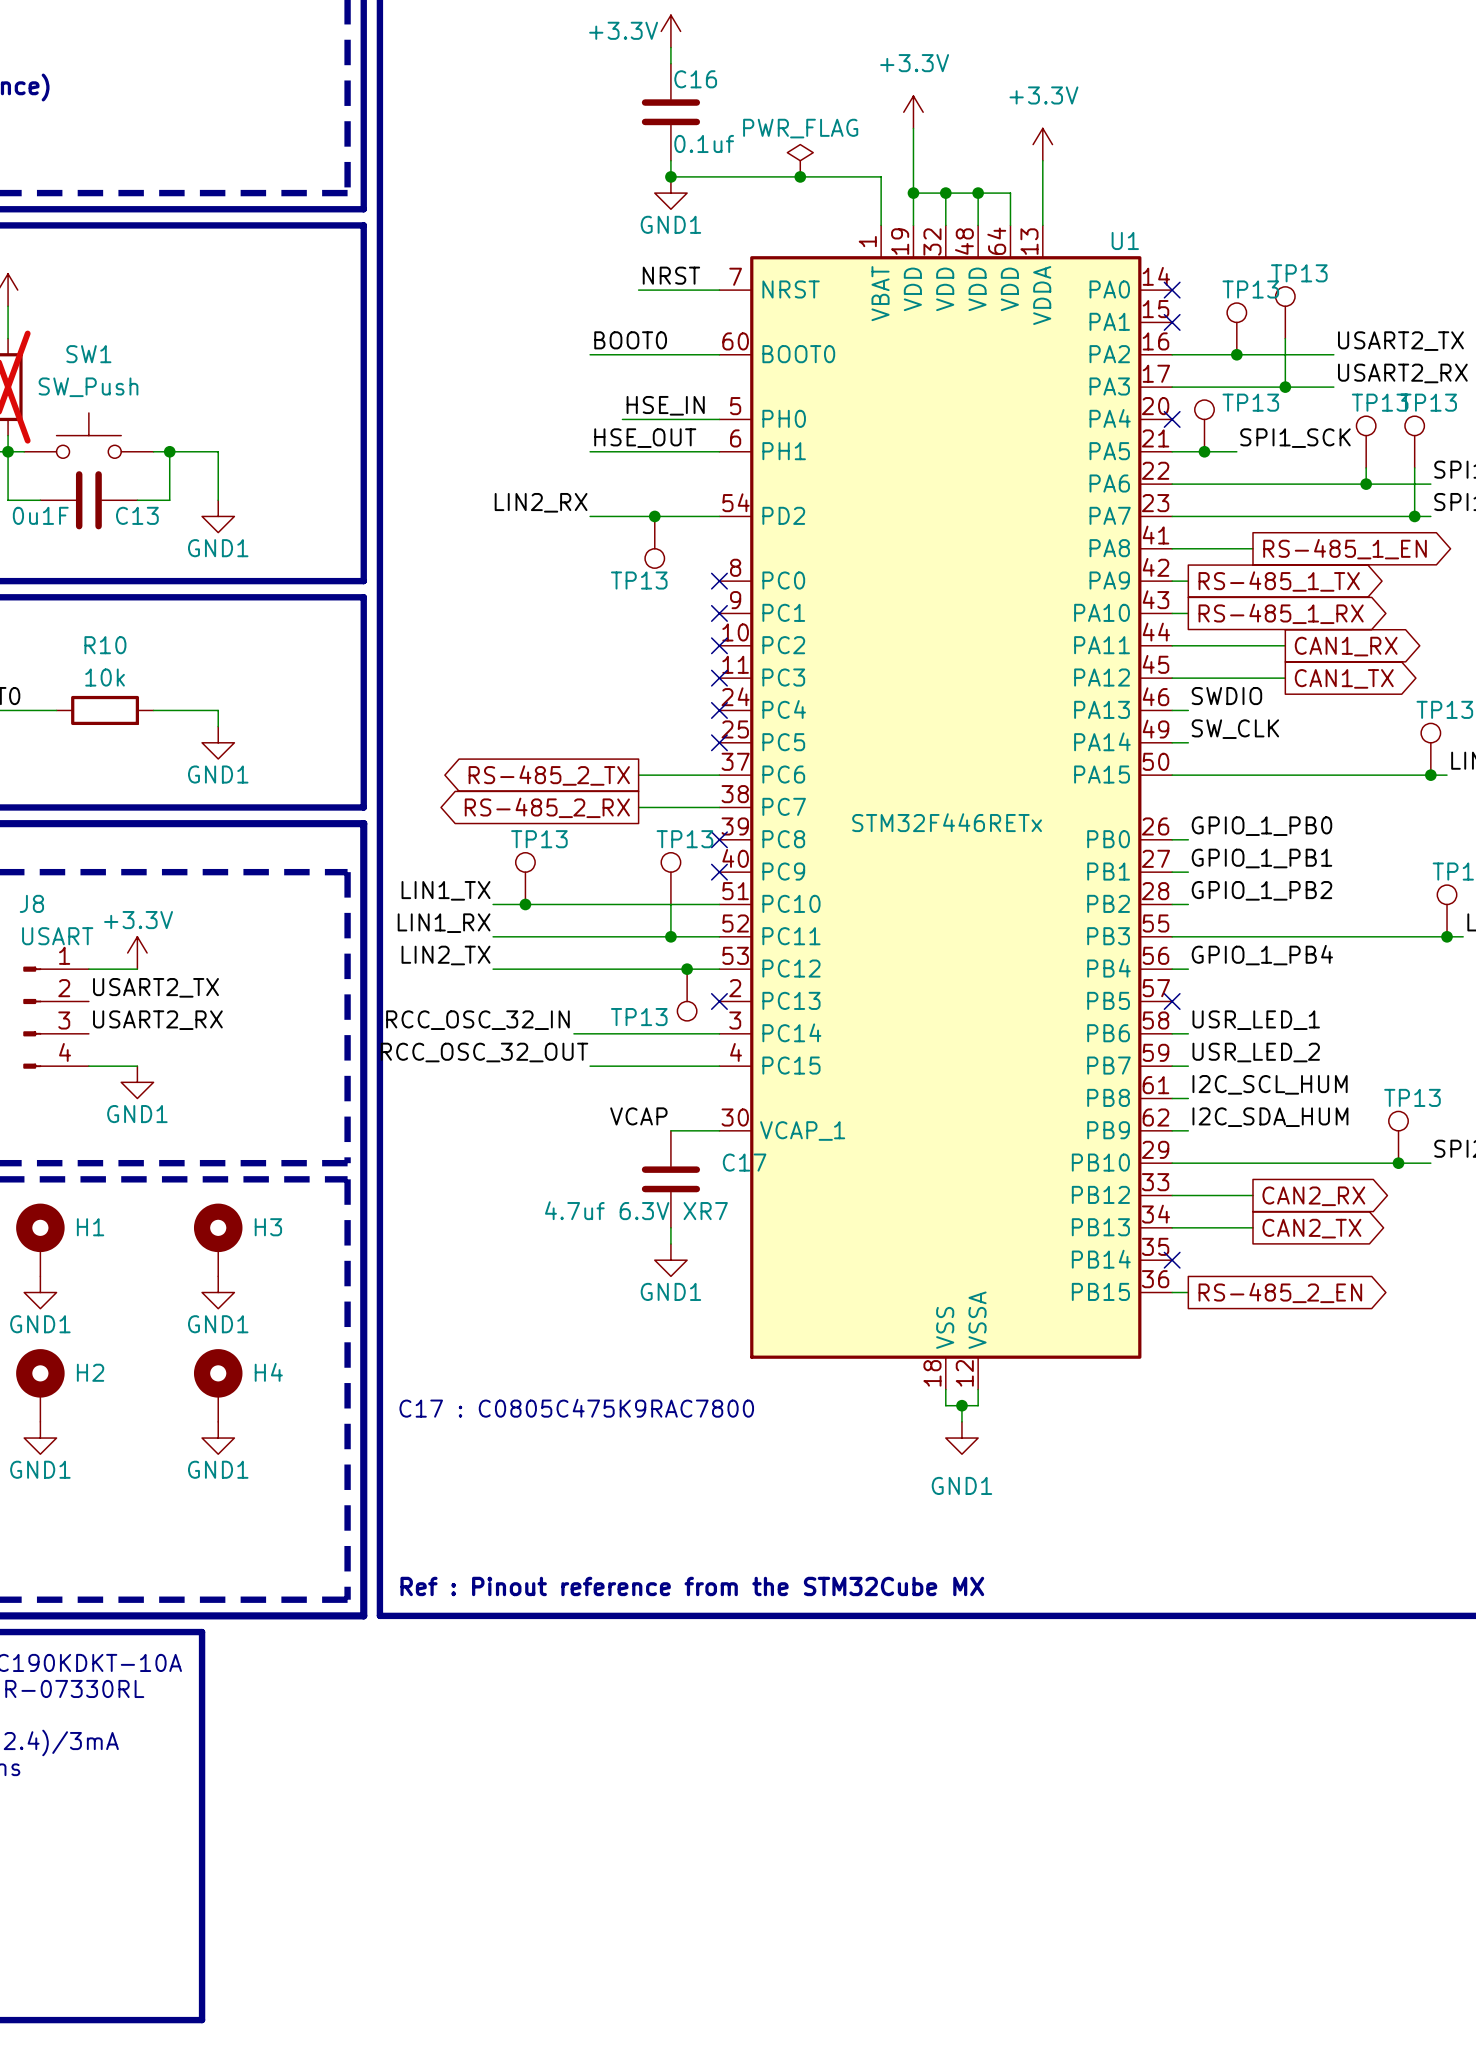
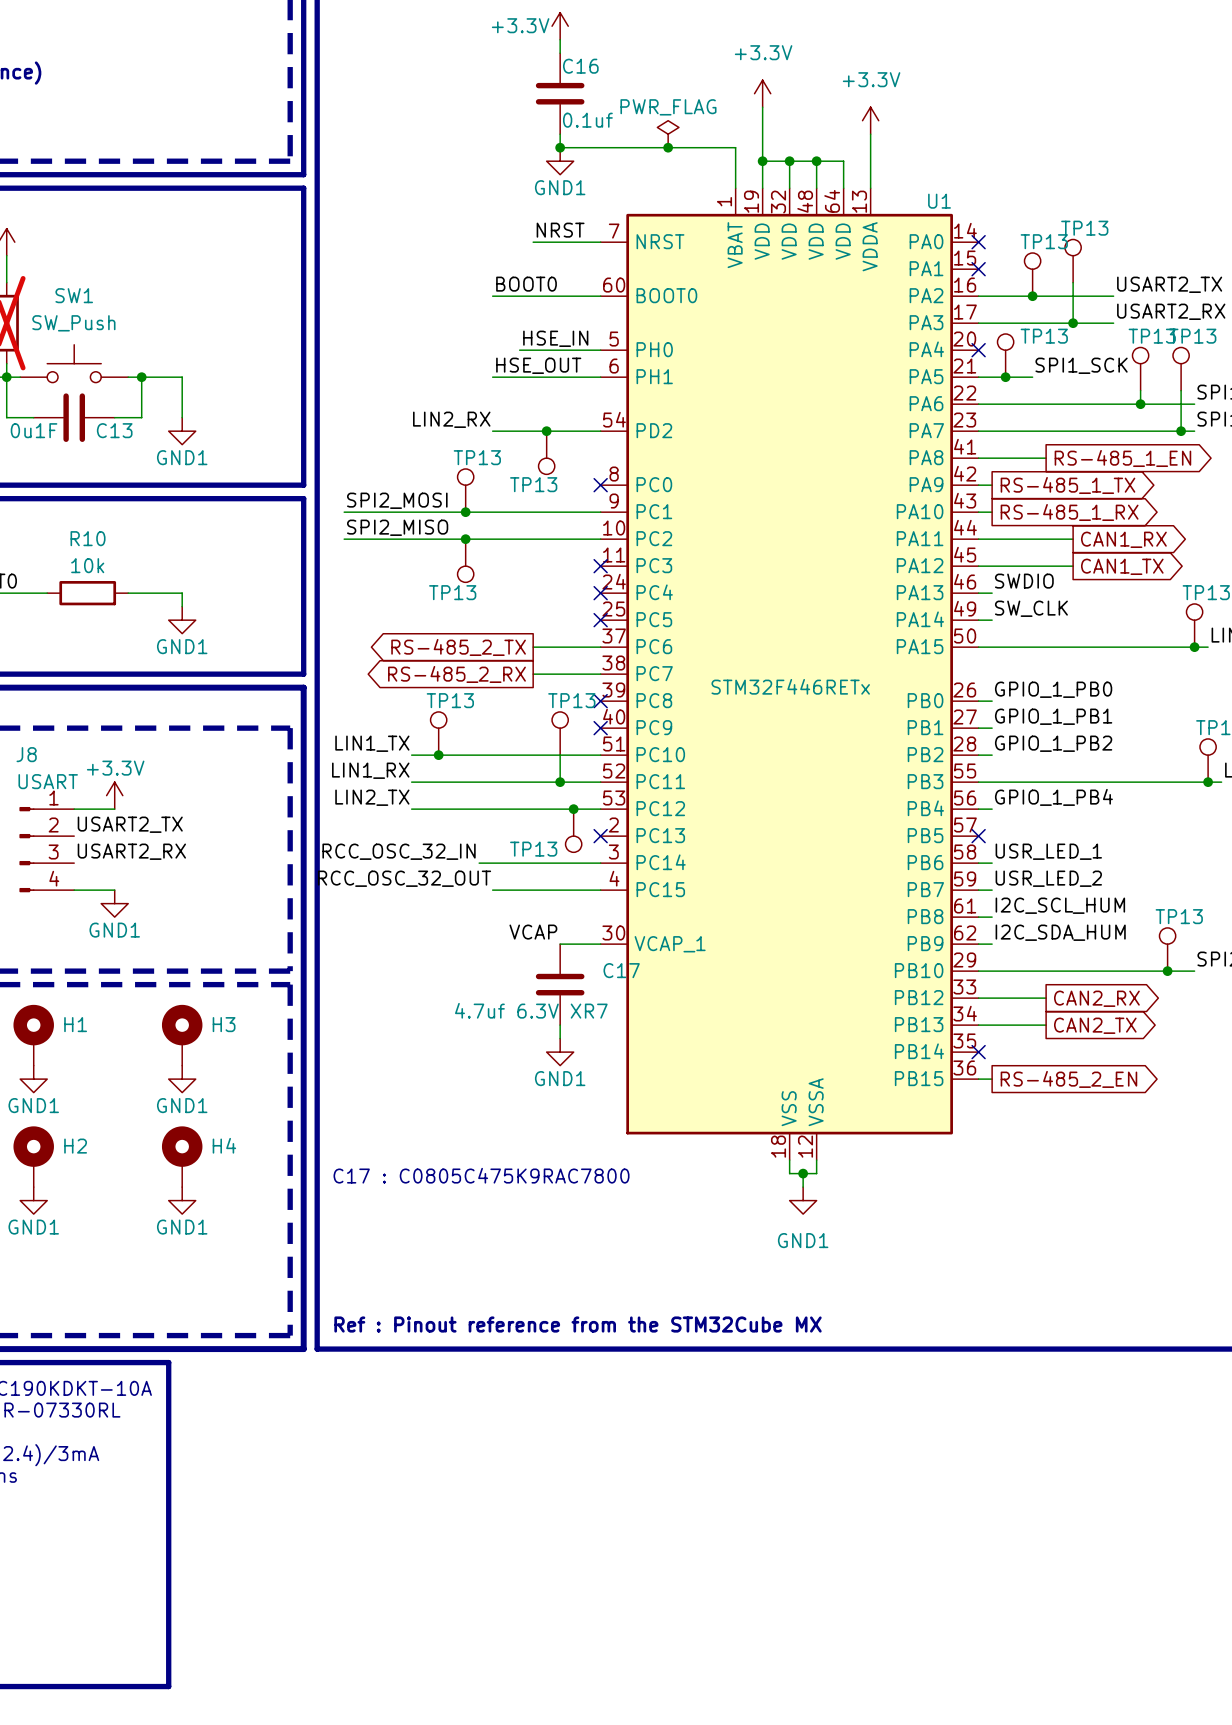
TP13: none -> (465, 490)
label: none -> SPI2_MOSI (397, 500)
wire: none -> (344, 512) (600, 512)
junction: none -> (465, 512)
no-connect mark: (719, 613) -> none
label: none -> SPI2_MISO (397, 527)
wire: none -> (344, 539) (600, 539)
junction: none -> (465, 539)
no-connect mark: (719, 645) -> none
TP13: none -> (465, 560)

